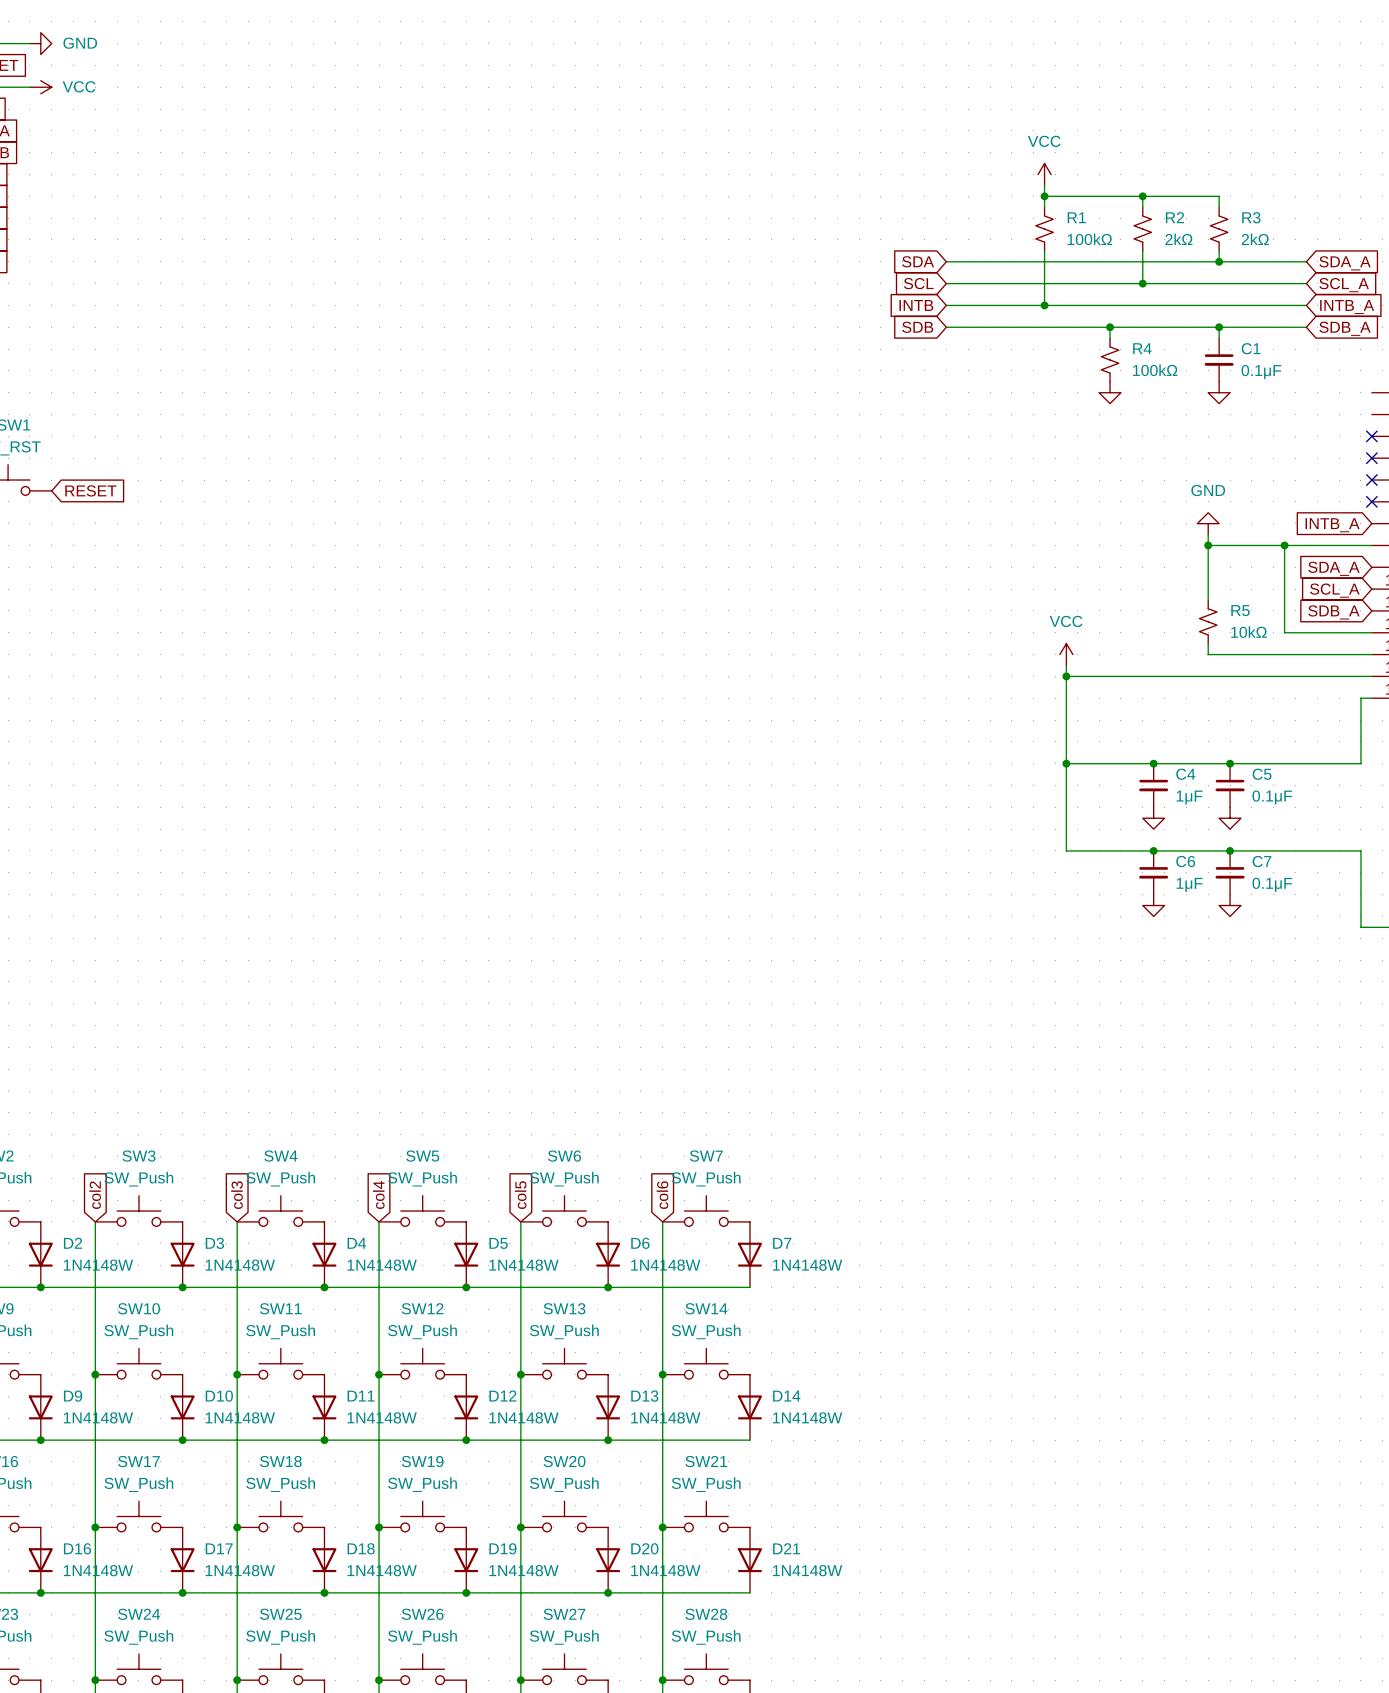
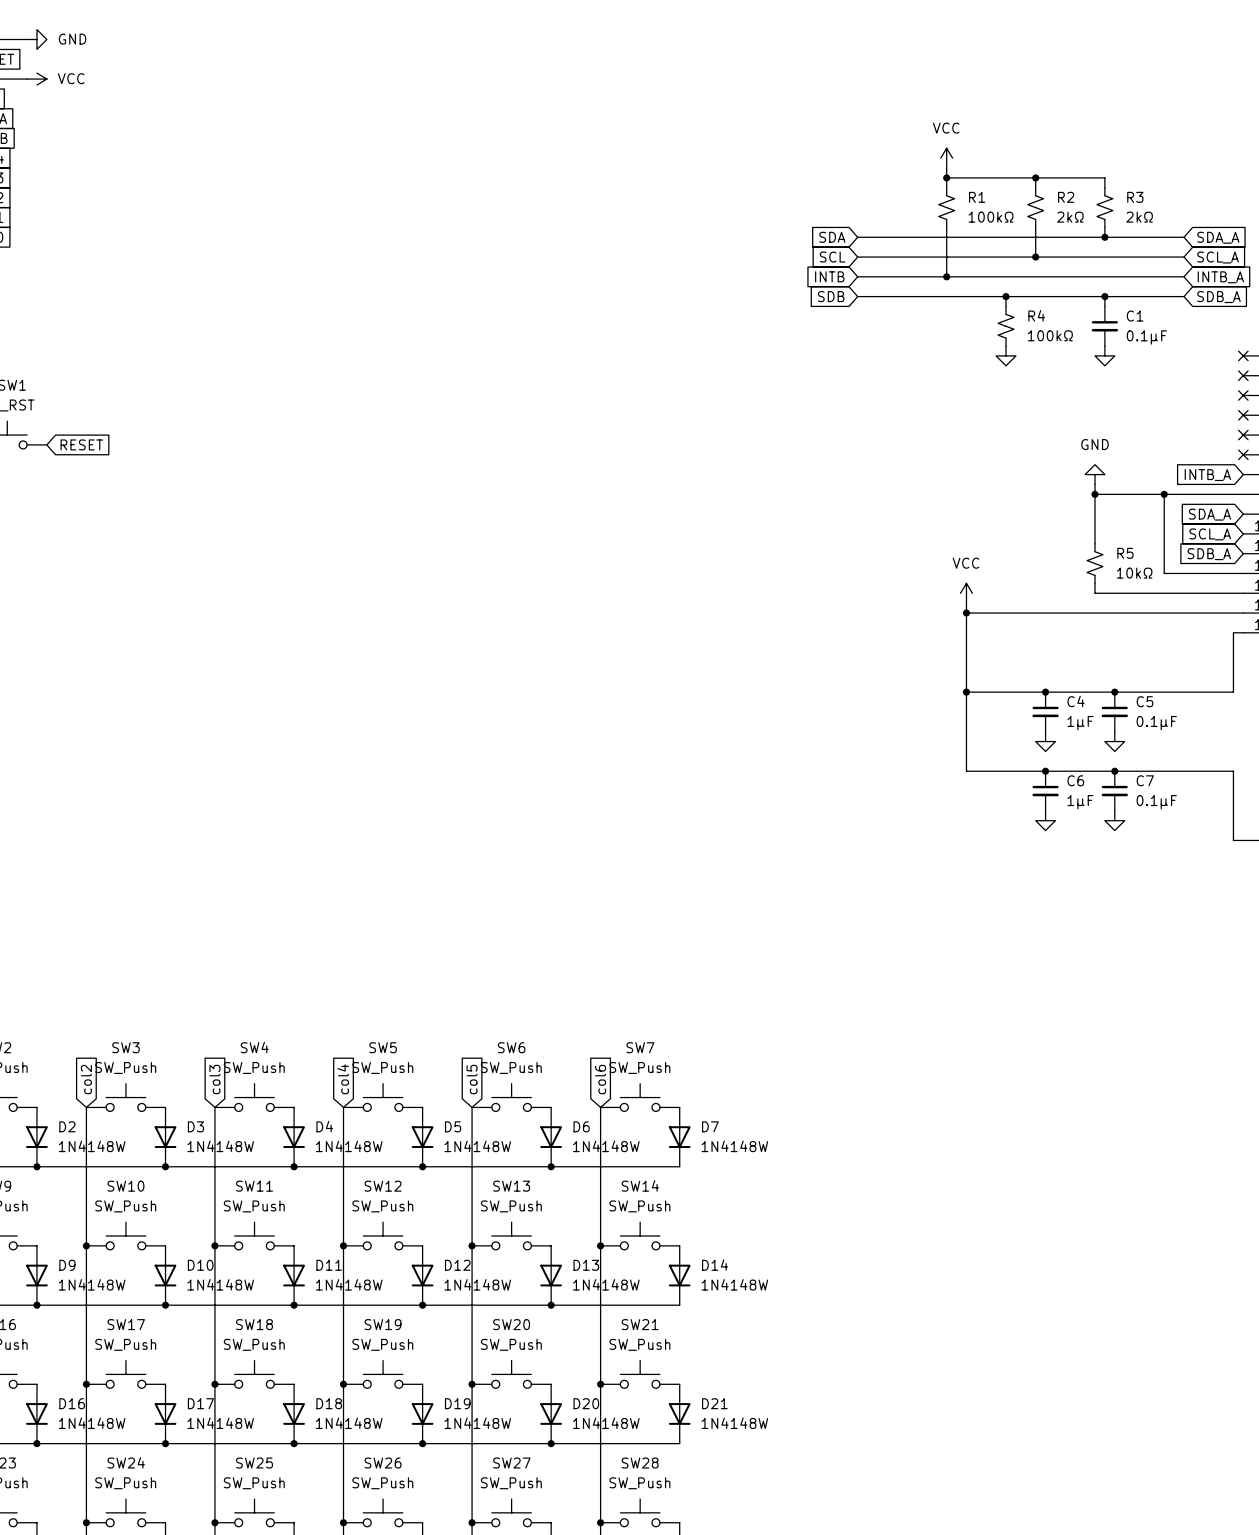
no-connect mark: none -> (1243, 355)
no-connect mark: none -> (1243, 375)

